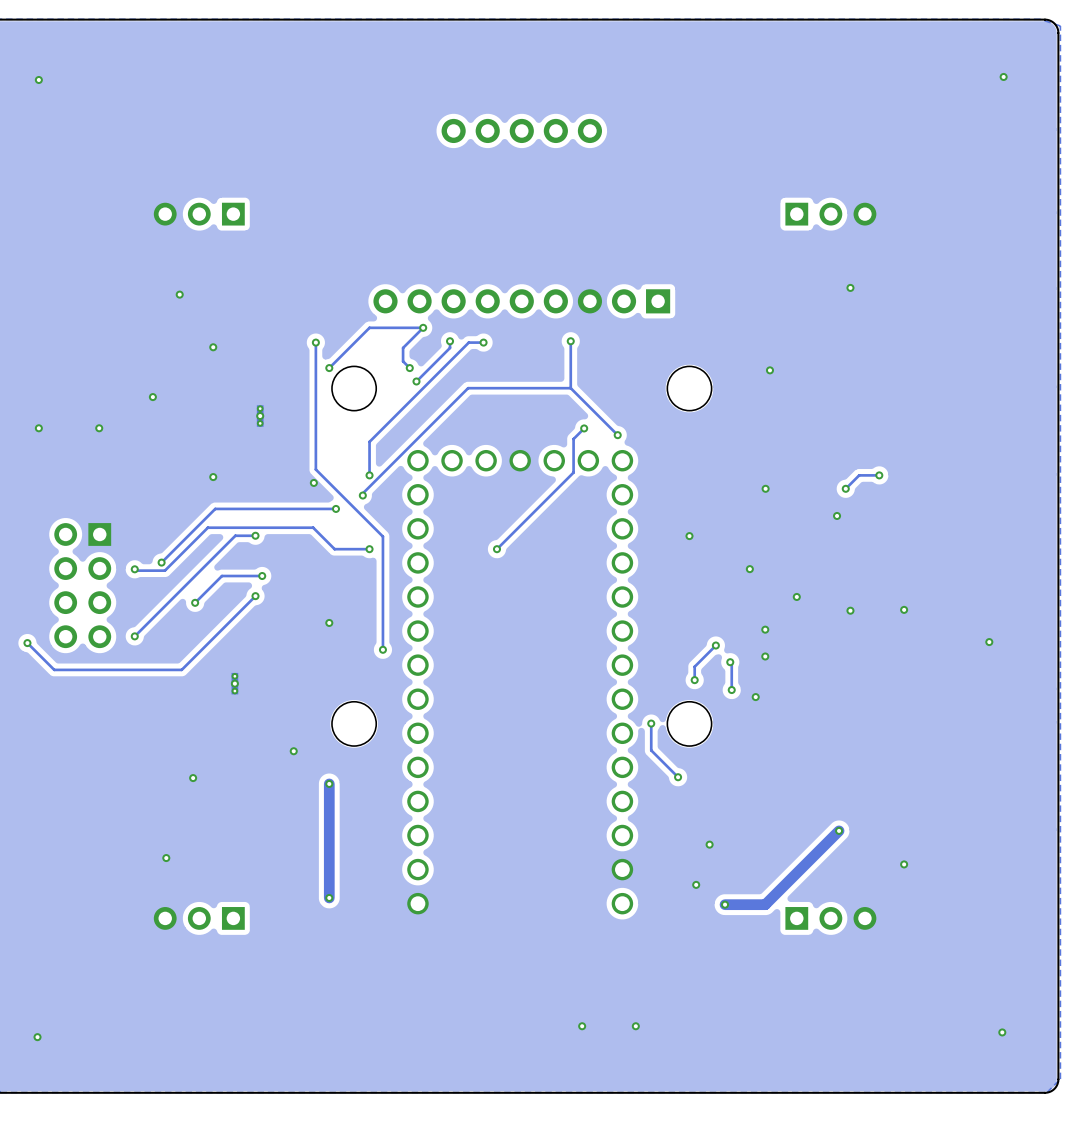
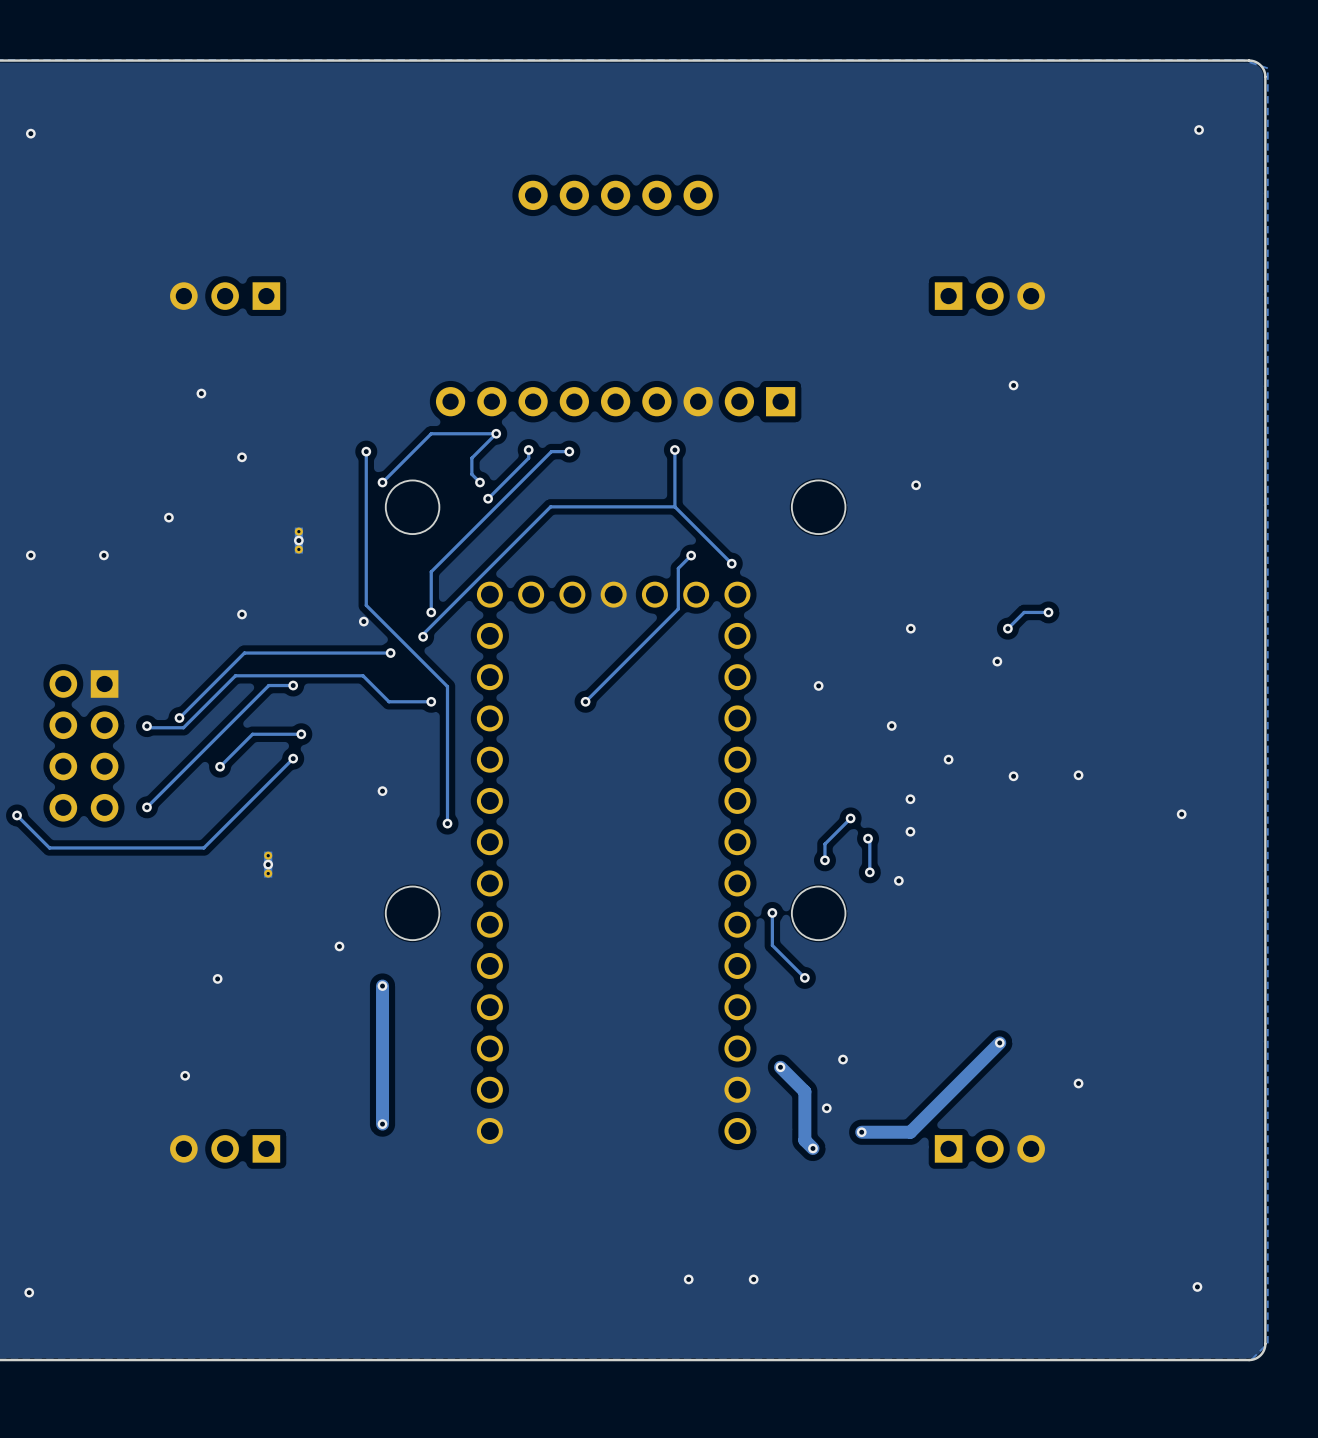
track: none -> (780, 1067) (804, 1091) (804, 1140) (812, 1148)
via: none -> (780, 1067)
via: none -> (812, 1148)

